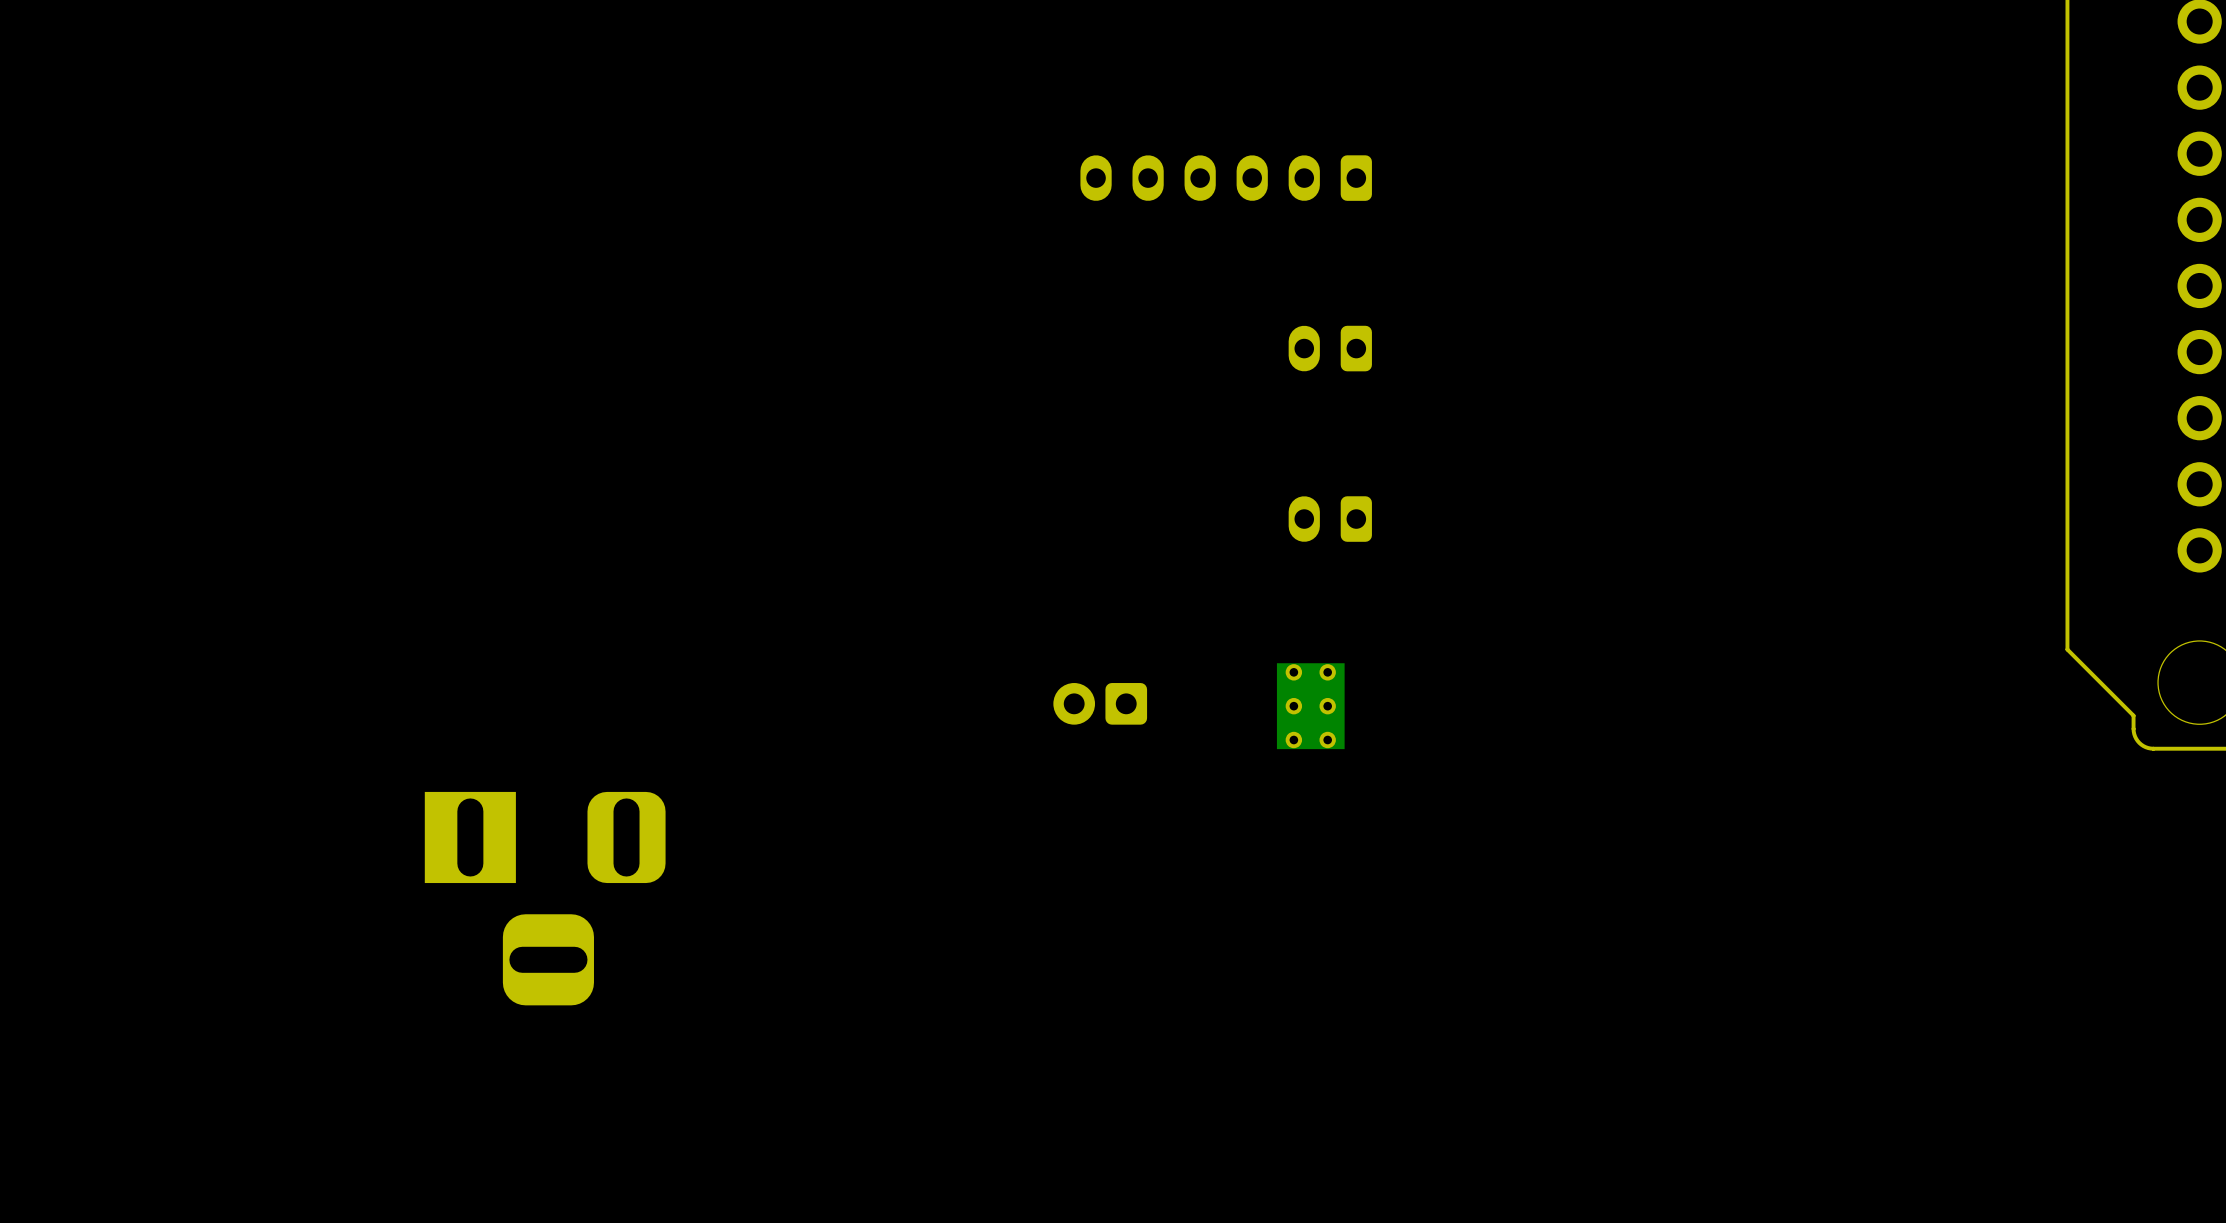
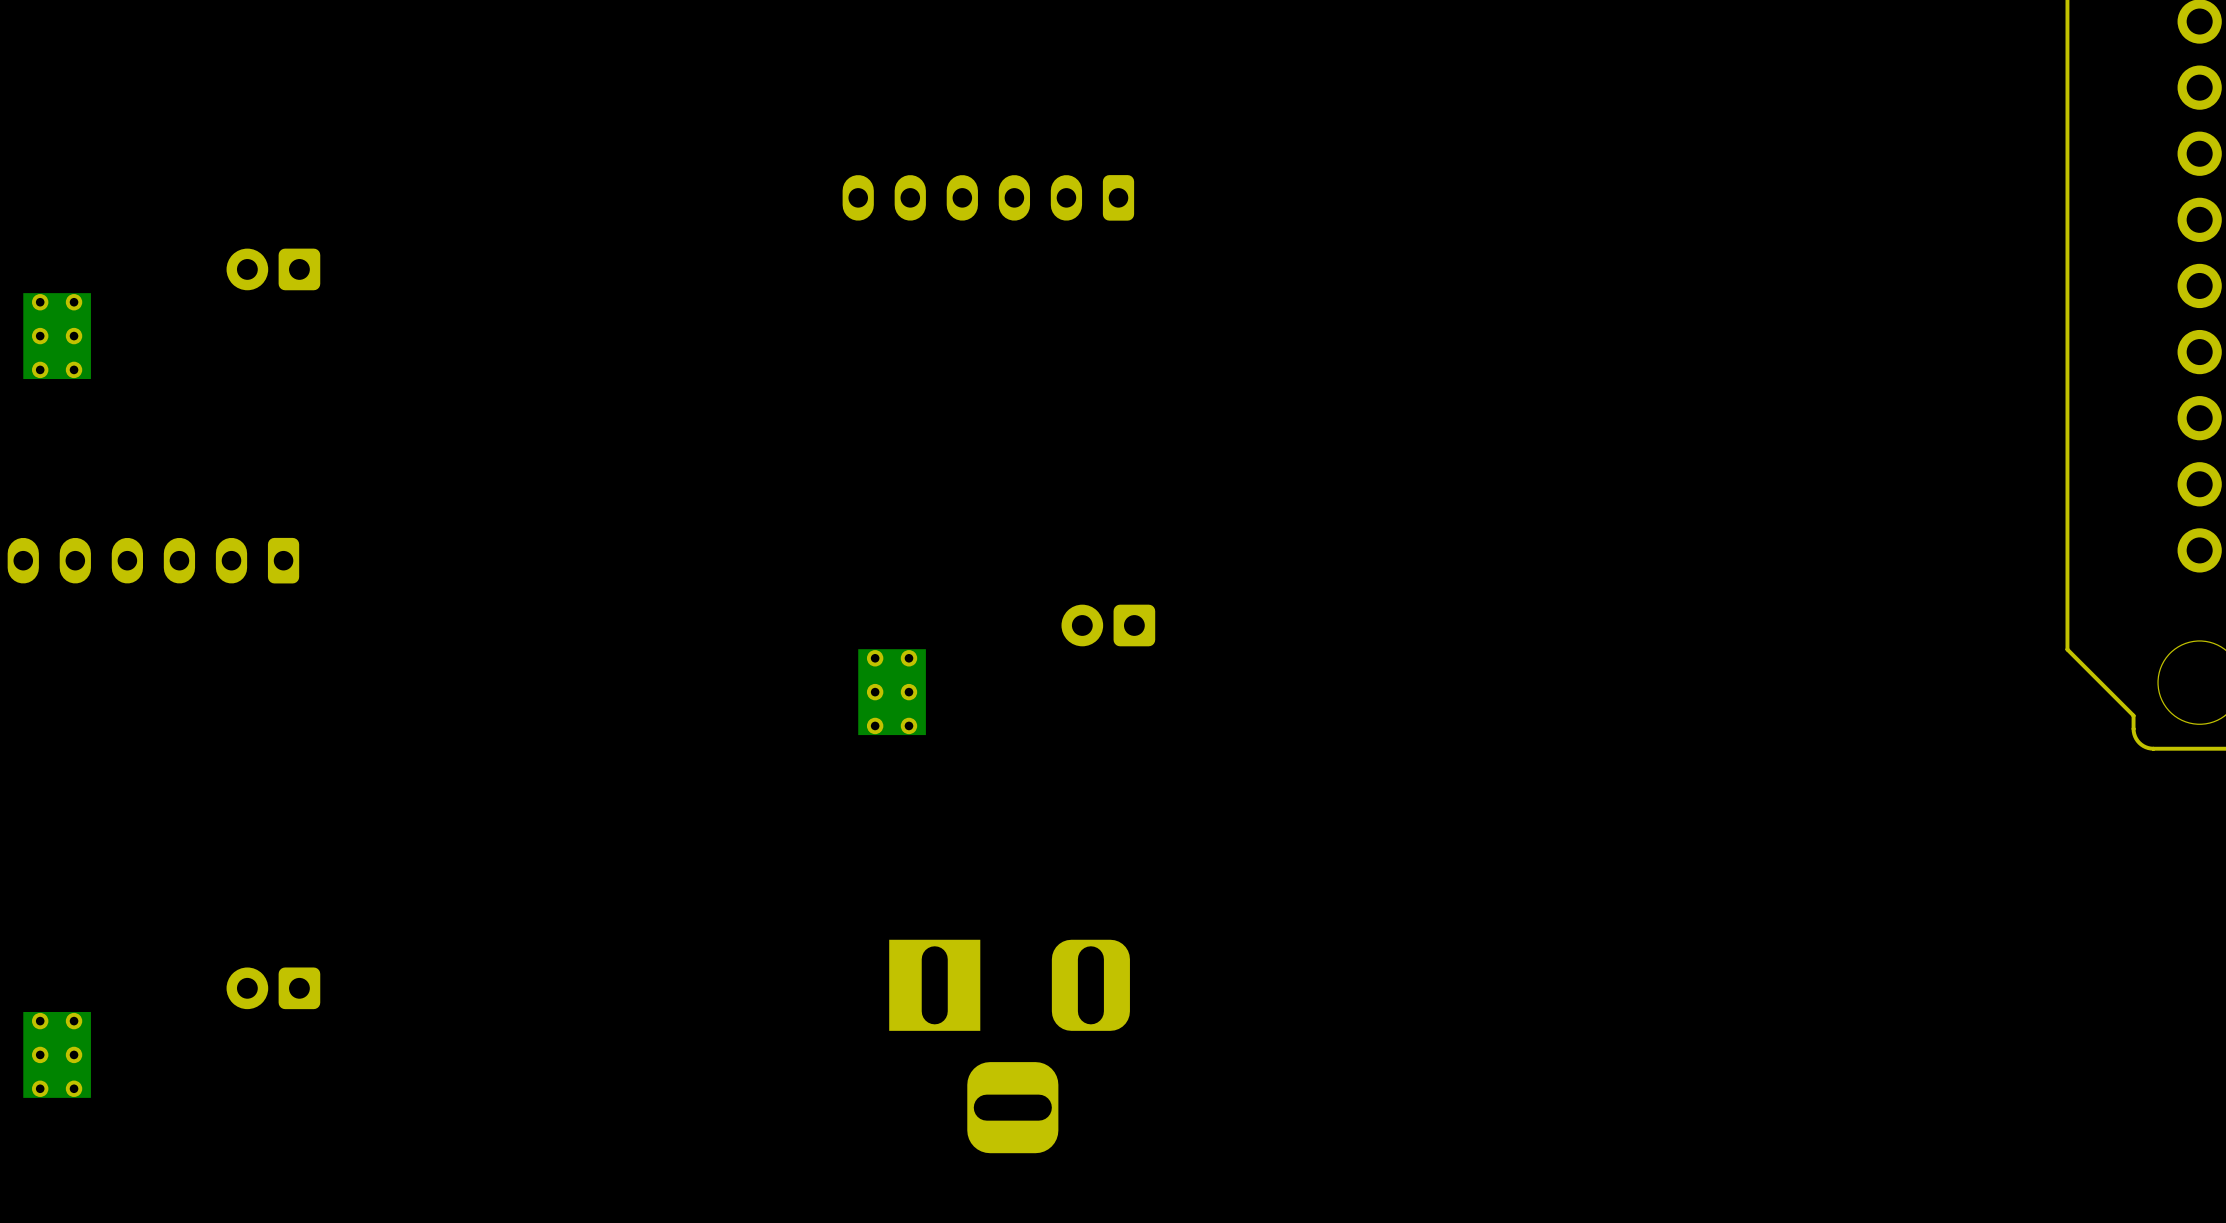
part position: (1226, 178) -> (988, 197)
part: none -> (273, 269)
part: none -> (57, 336)
part: (1330, 348) -> none
part: (1330, 519) -> none
part: none -> (153, 560)
part position: (1100, 703) -> (1108, 625)
part position: (1310, 706) -> (892, 692)
part position: (545, 898) -> (1009, 1046)
part: none -> (273, 988)
part: none -> (57, 1054)

